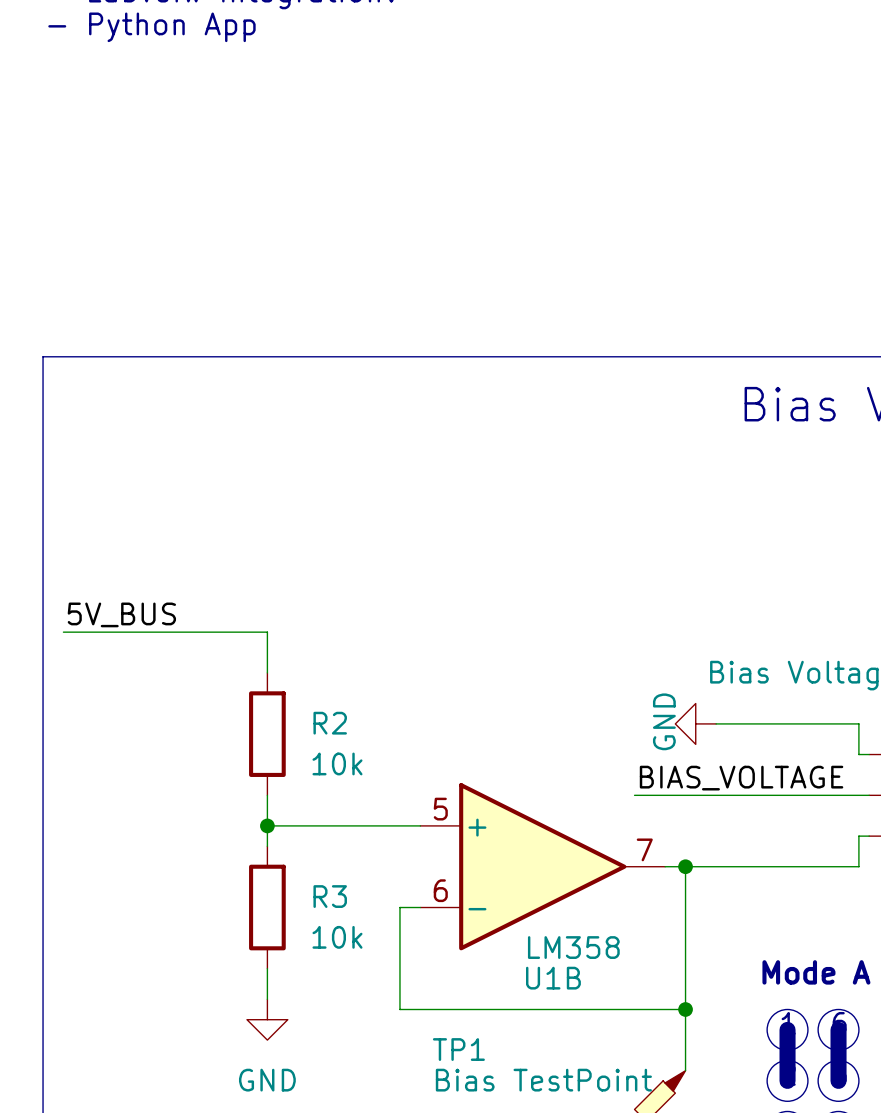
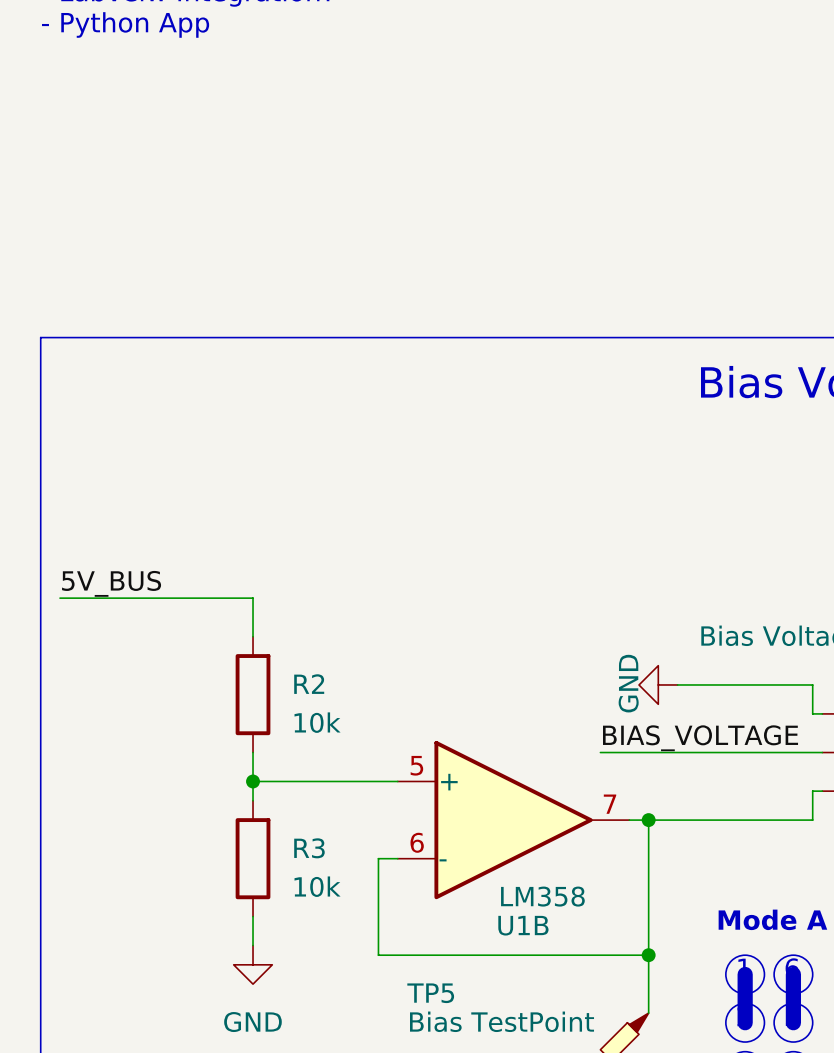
TP1 name: TP1 (458, 1049) -> TP5 (430, 993)

